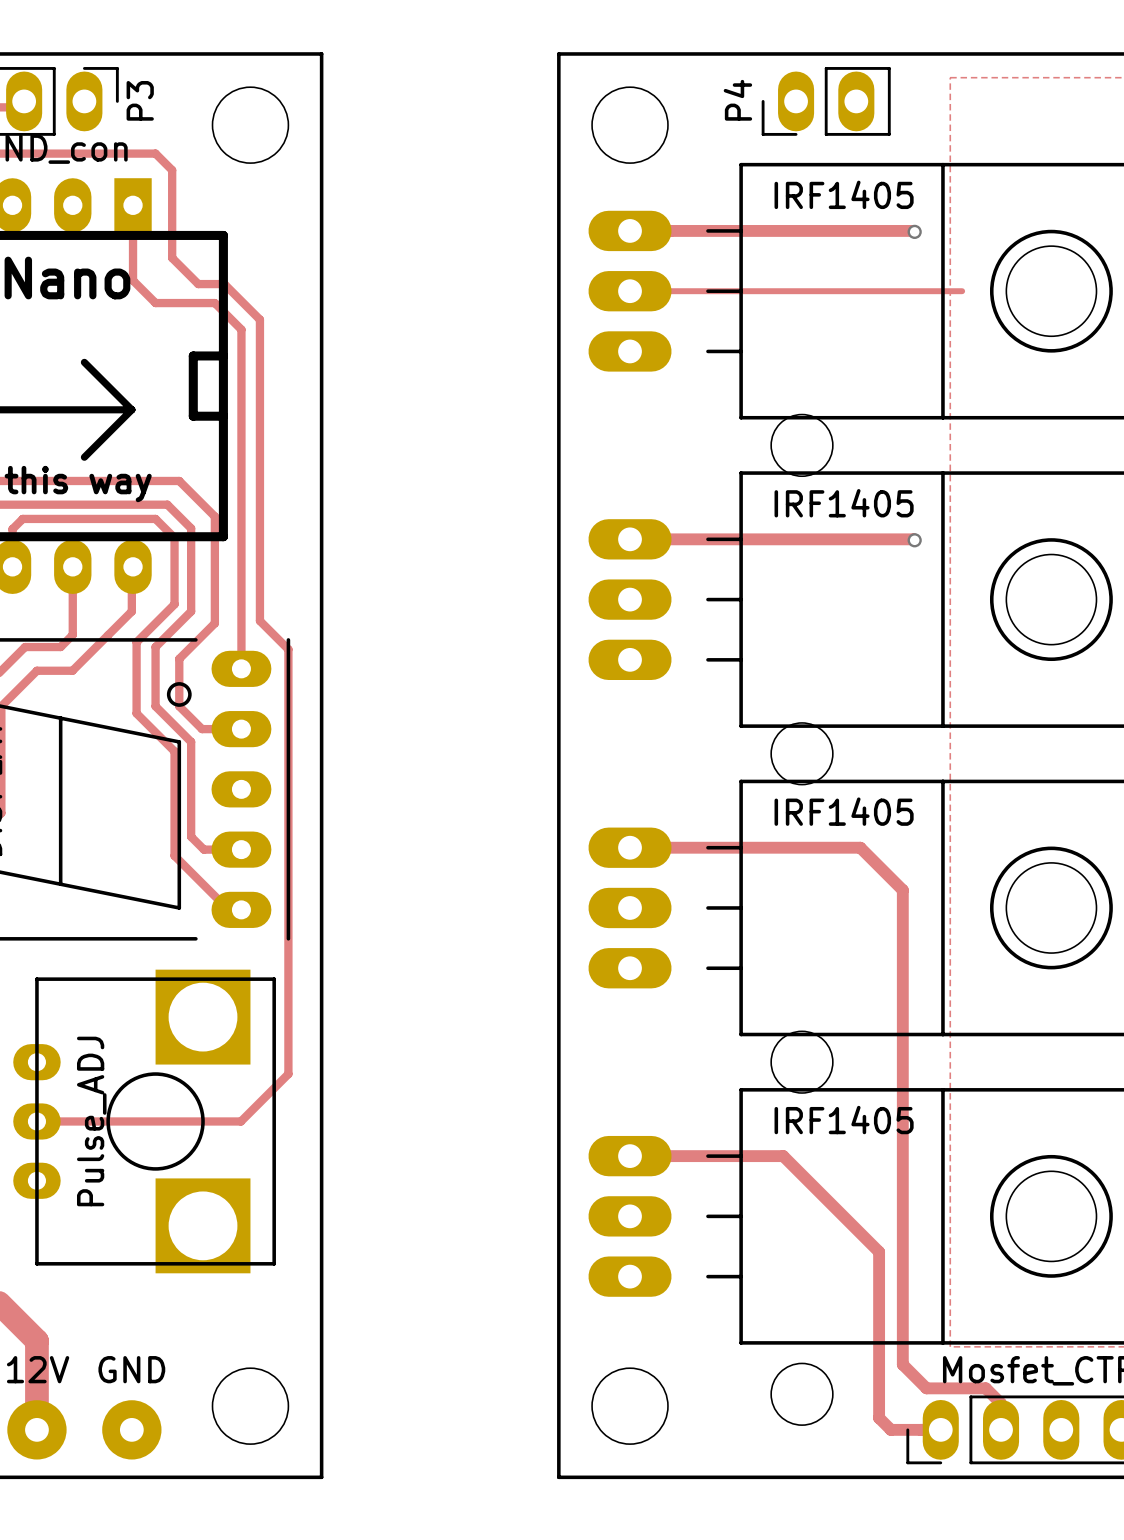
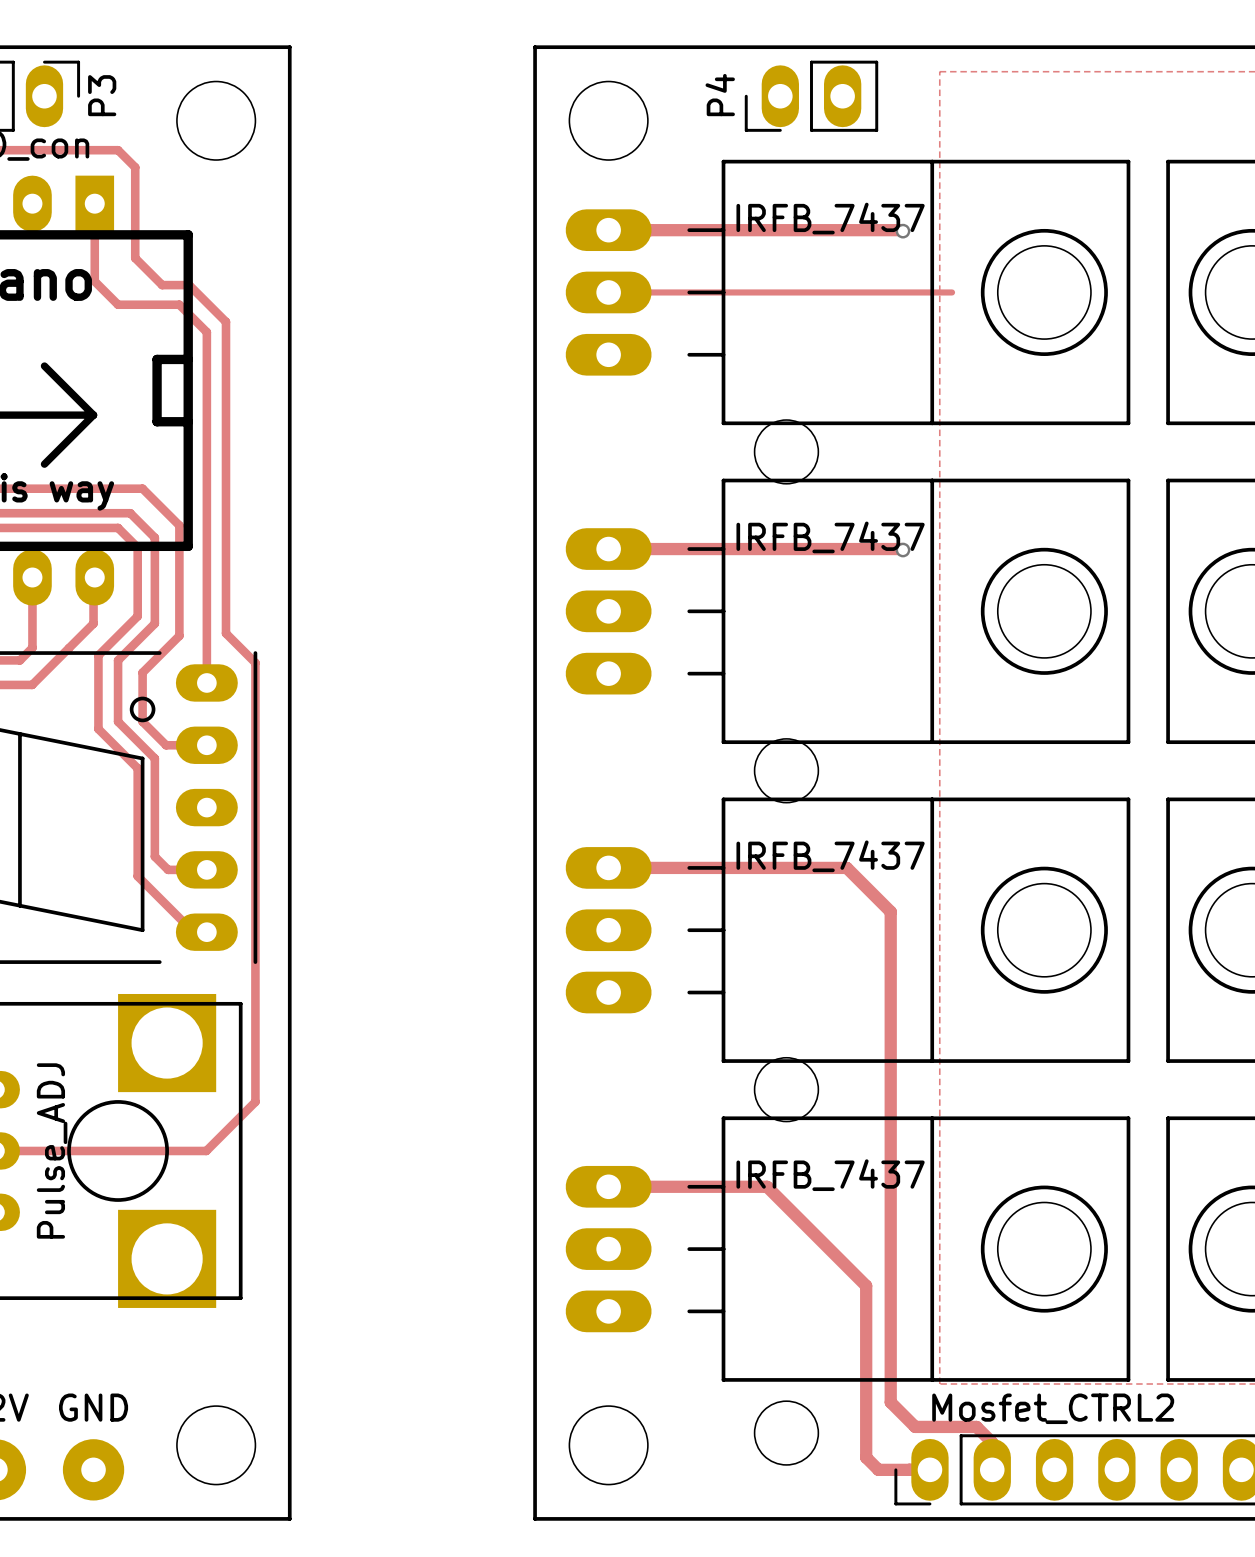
part value: IRF1405 (844, 194) -> IRFB_7437 (830, 218)
part value: IRF1405 (844, 503) -> IRFB_7437 (830, 537)
part value: IRF1405 (844, 811) -> IRFB_7437 (830, 856)
part value: IRF1405 (844, 1120) -> IRFB_7437 (830, 1175)

